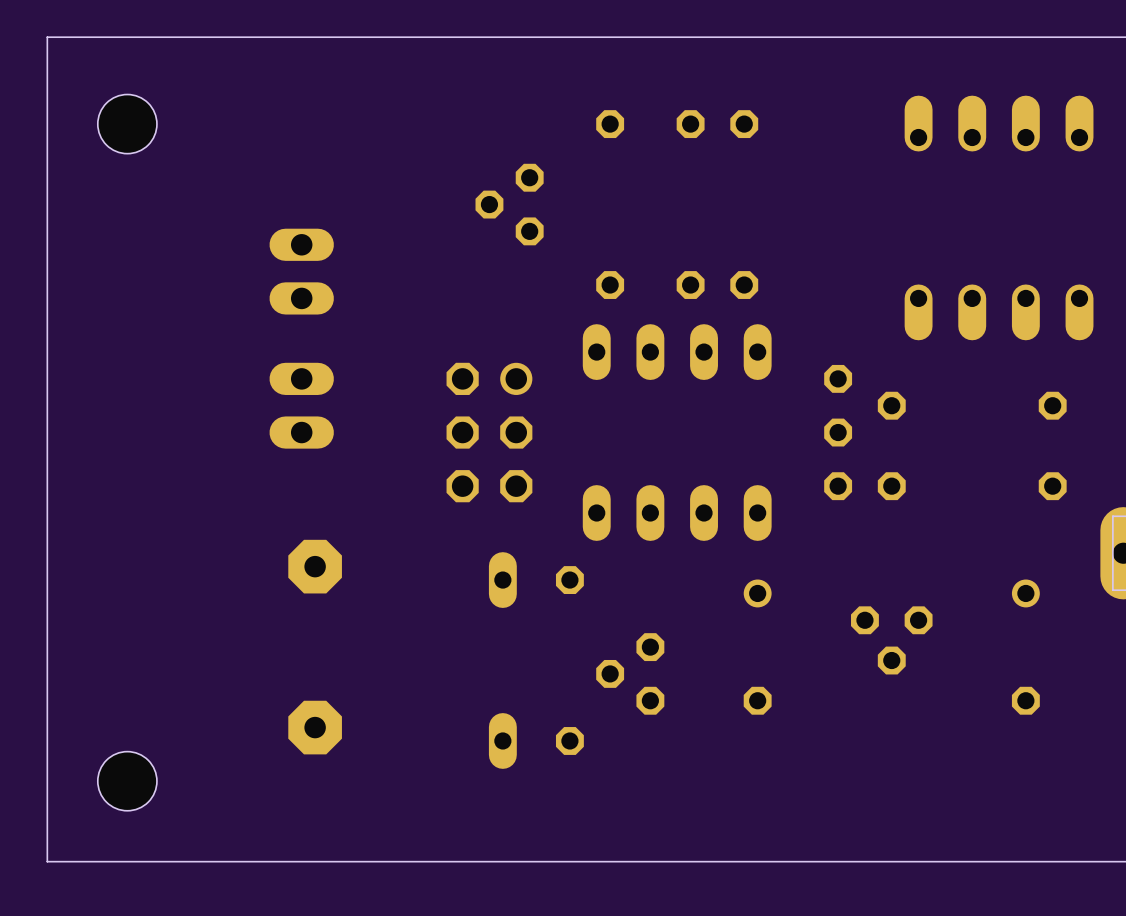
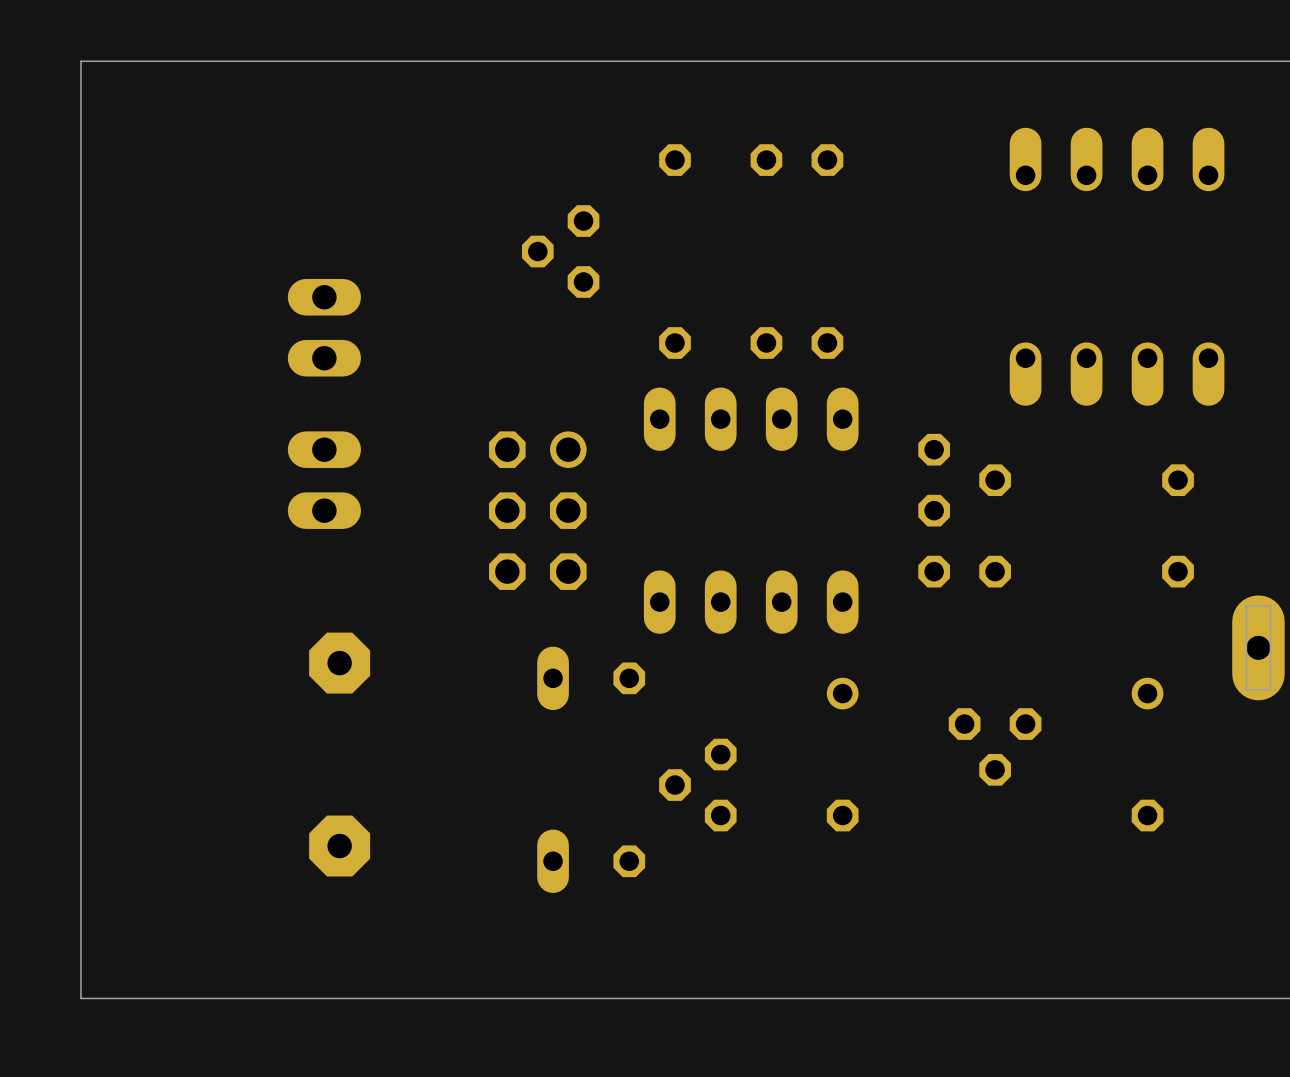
board edge: (87, 37) (47, 37) (47, 861) (87, 861) -> (80, 61) (80, 998)
part: (127, 124) -> none
part: (127, 781) -> none

